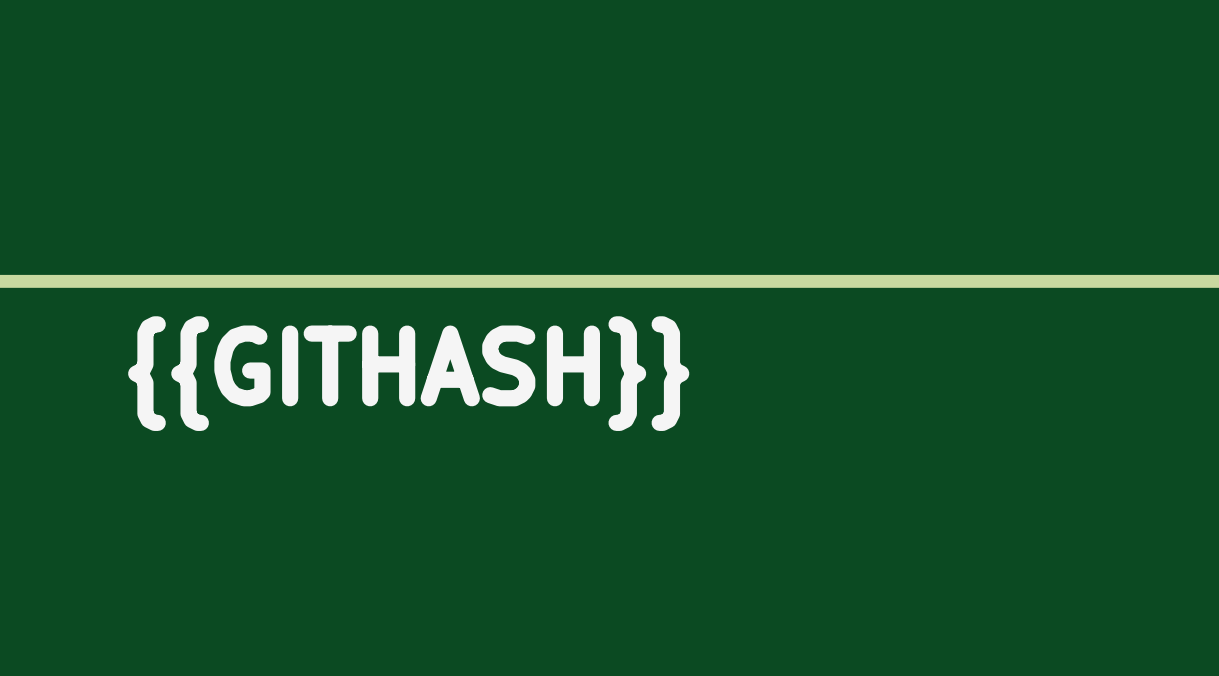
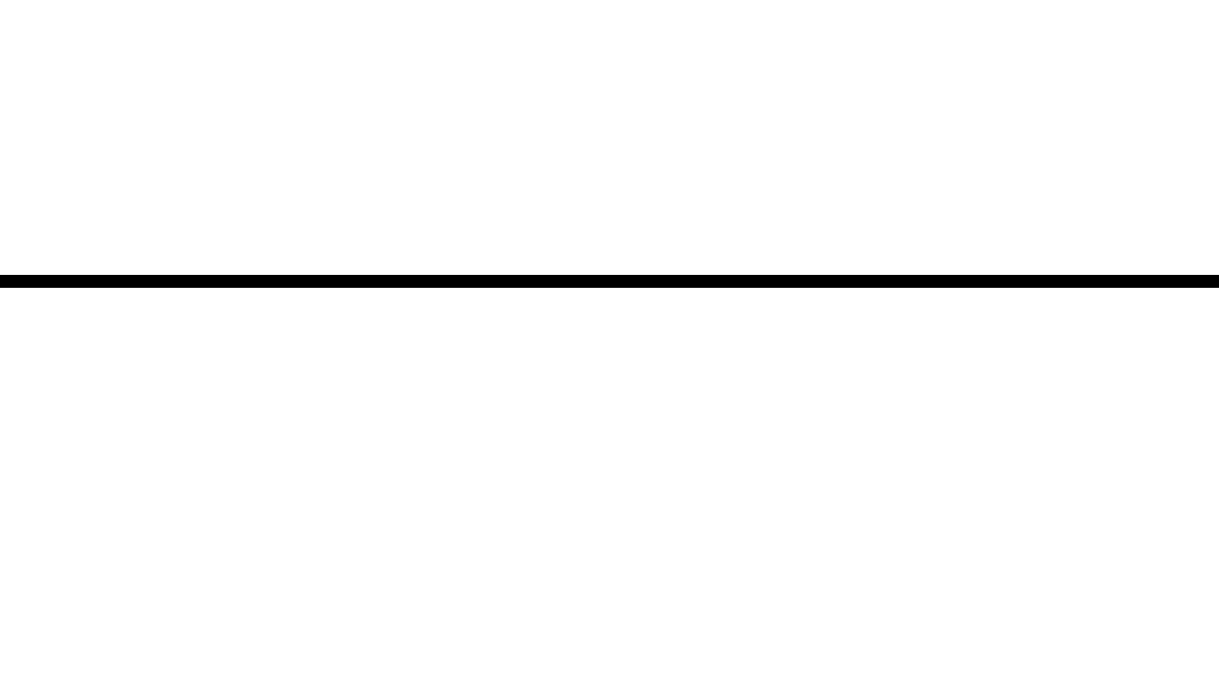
text: {{GITHASH}} (408, 373) -> none

